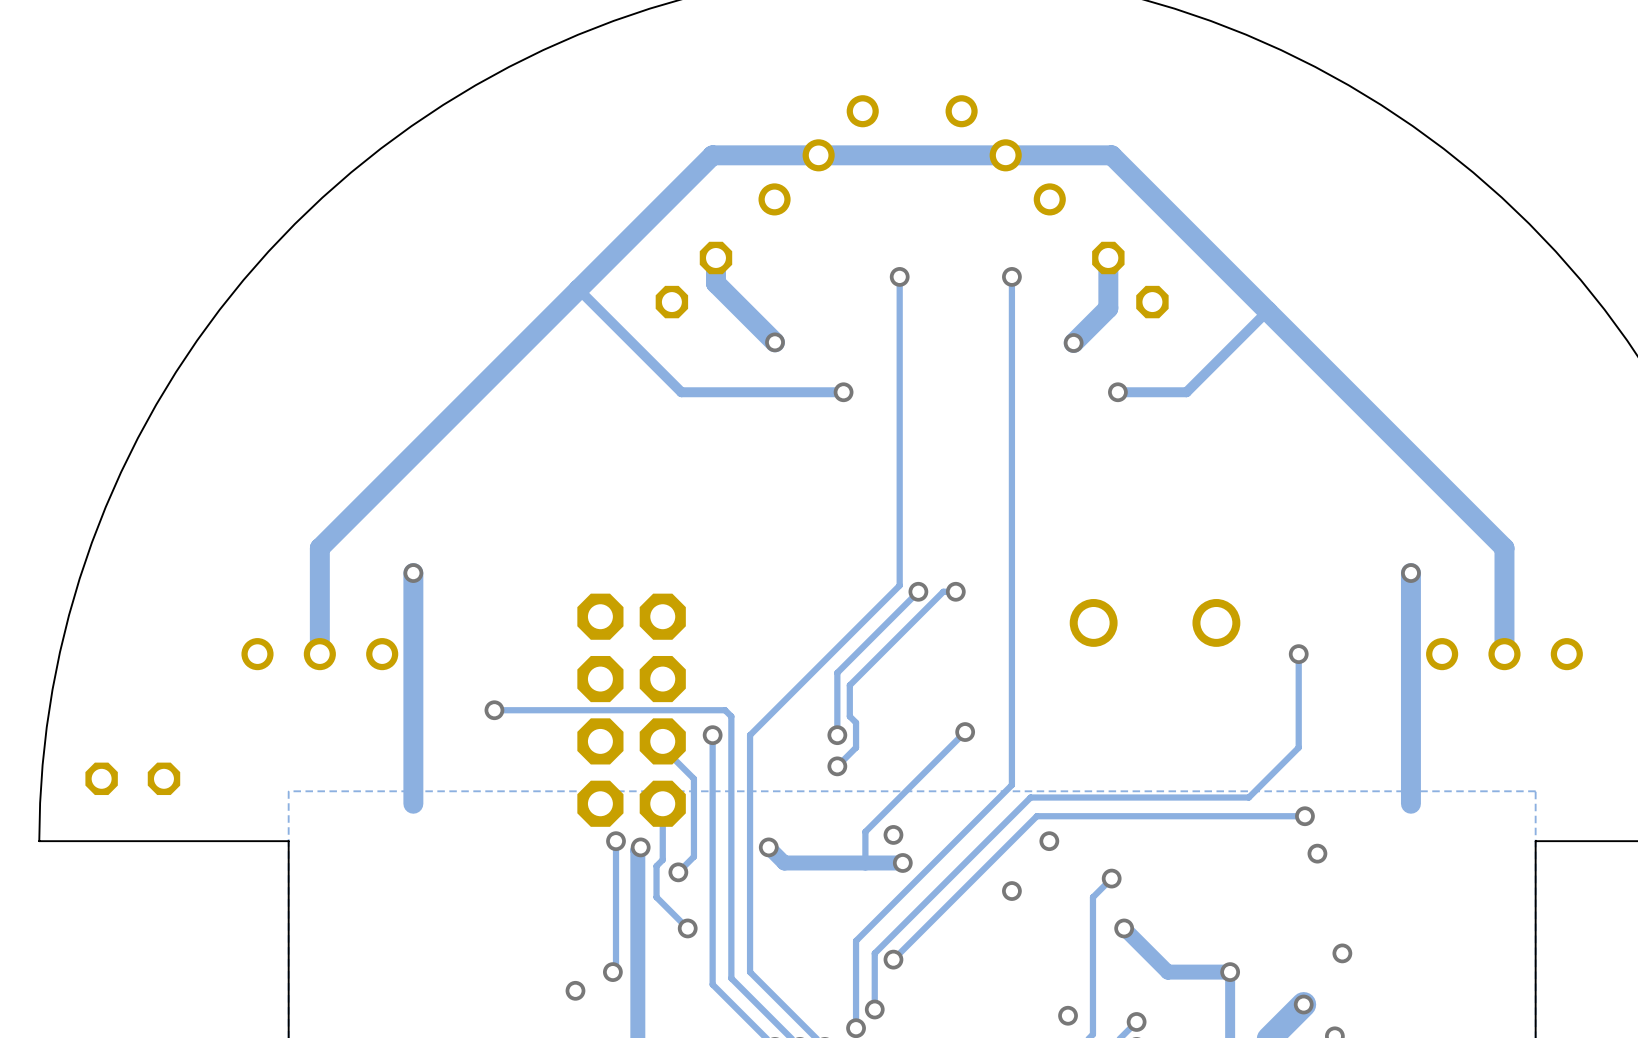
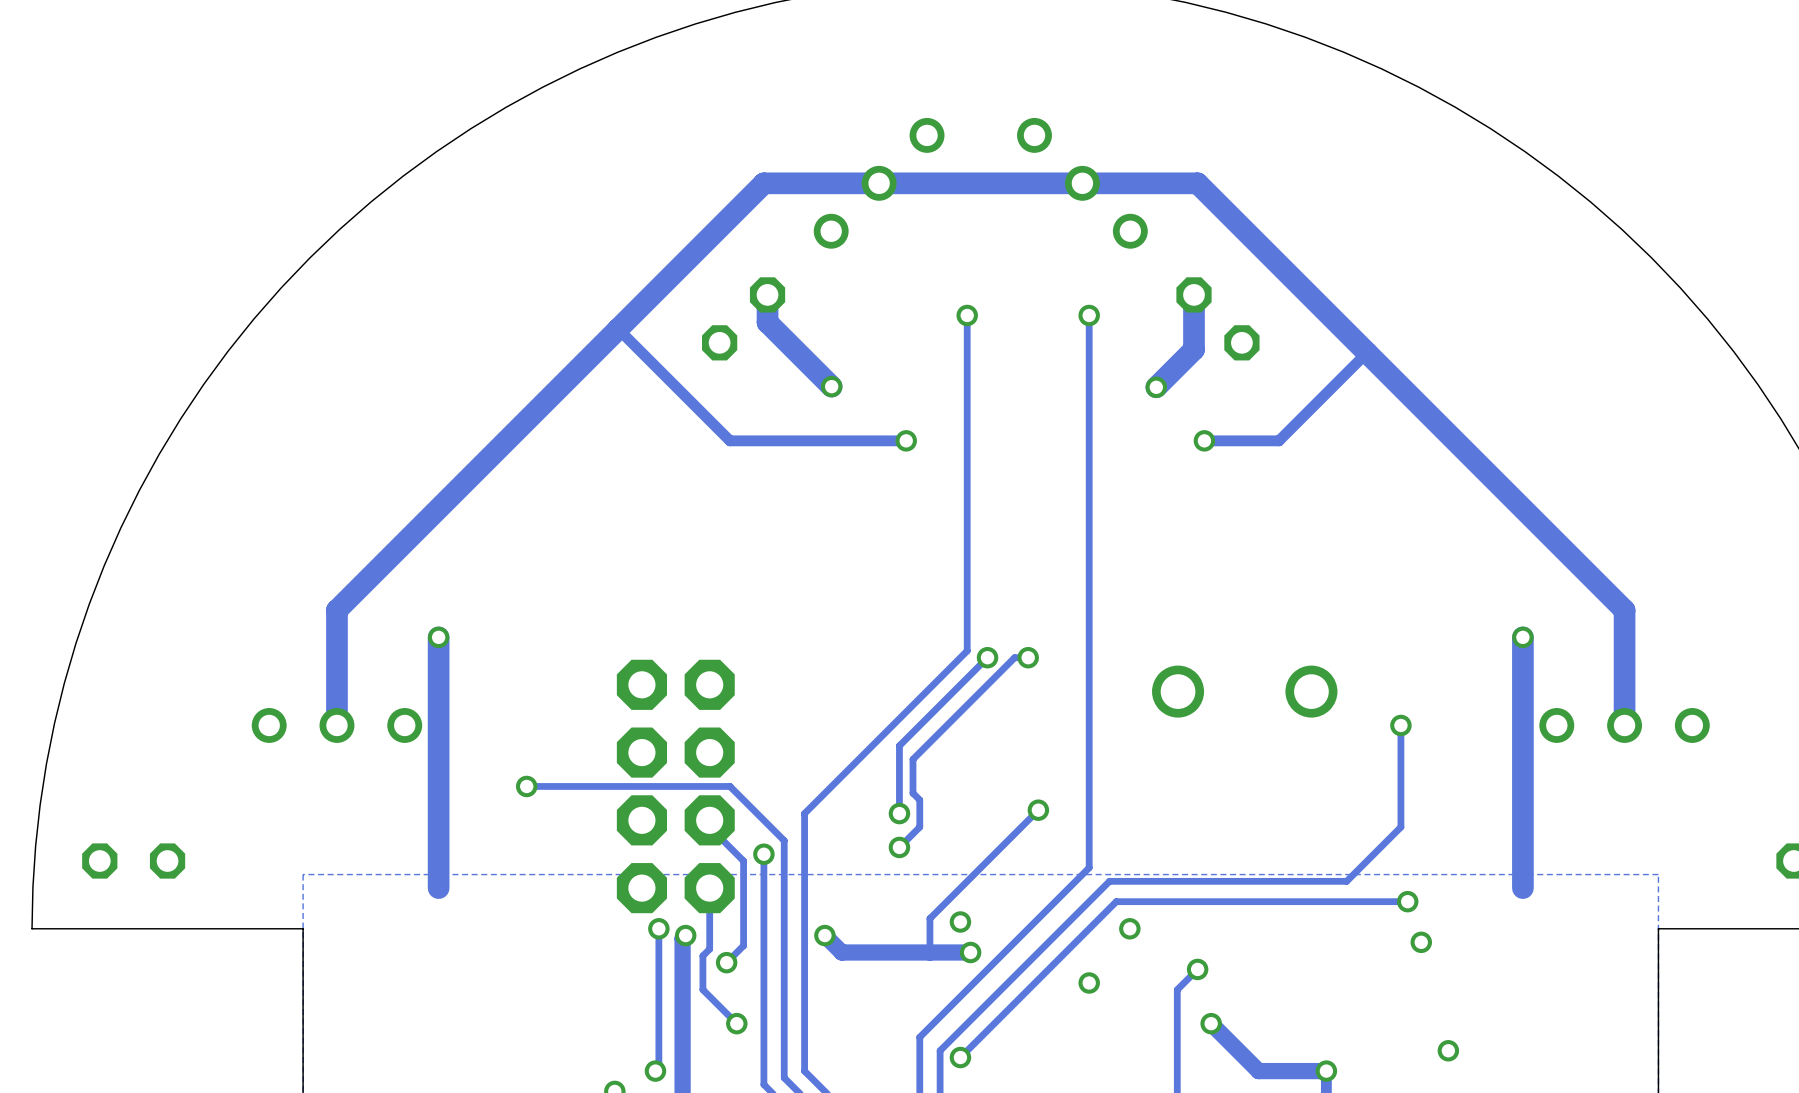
track: (681, 710) (725, 710) (731, 716) (731, 760) -> (730, 786) (784, 840)
track: (712, 735) (712, 772) -> none
via position: (712, 735) -> (763, 854)

